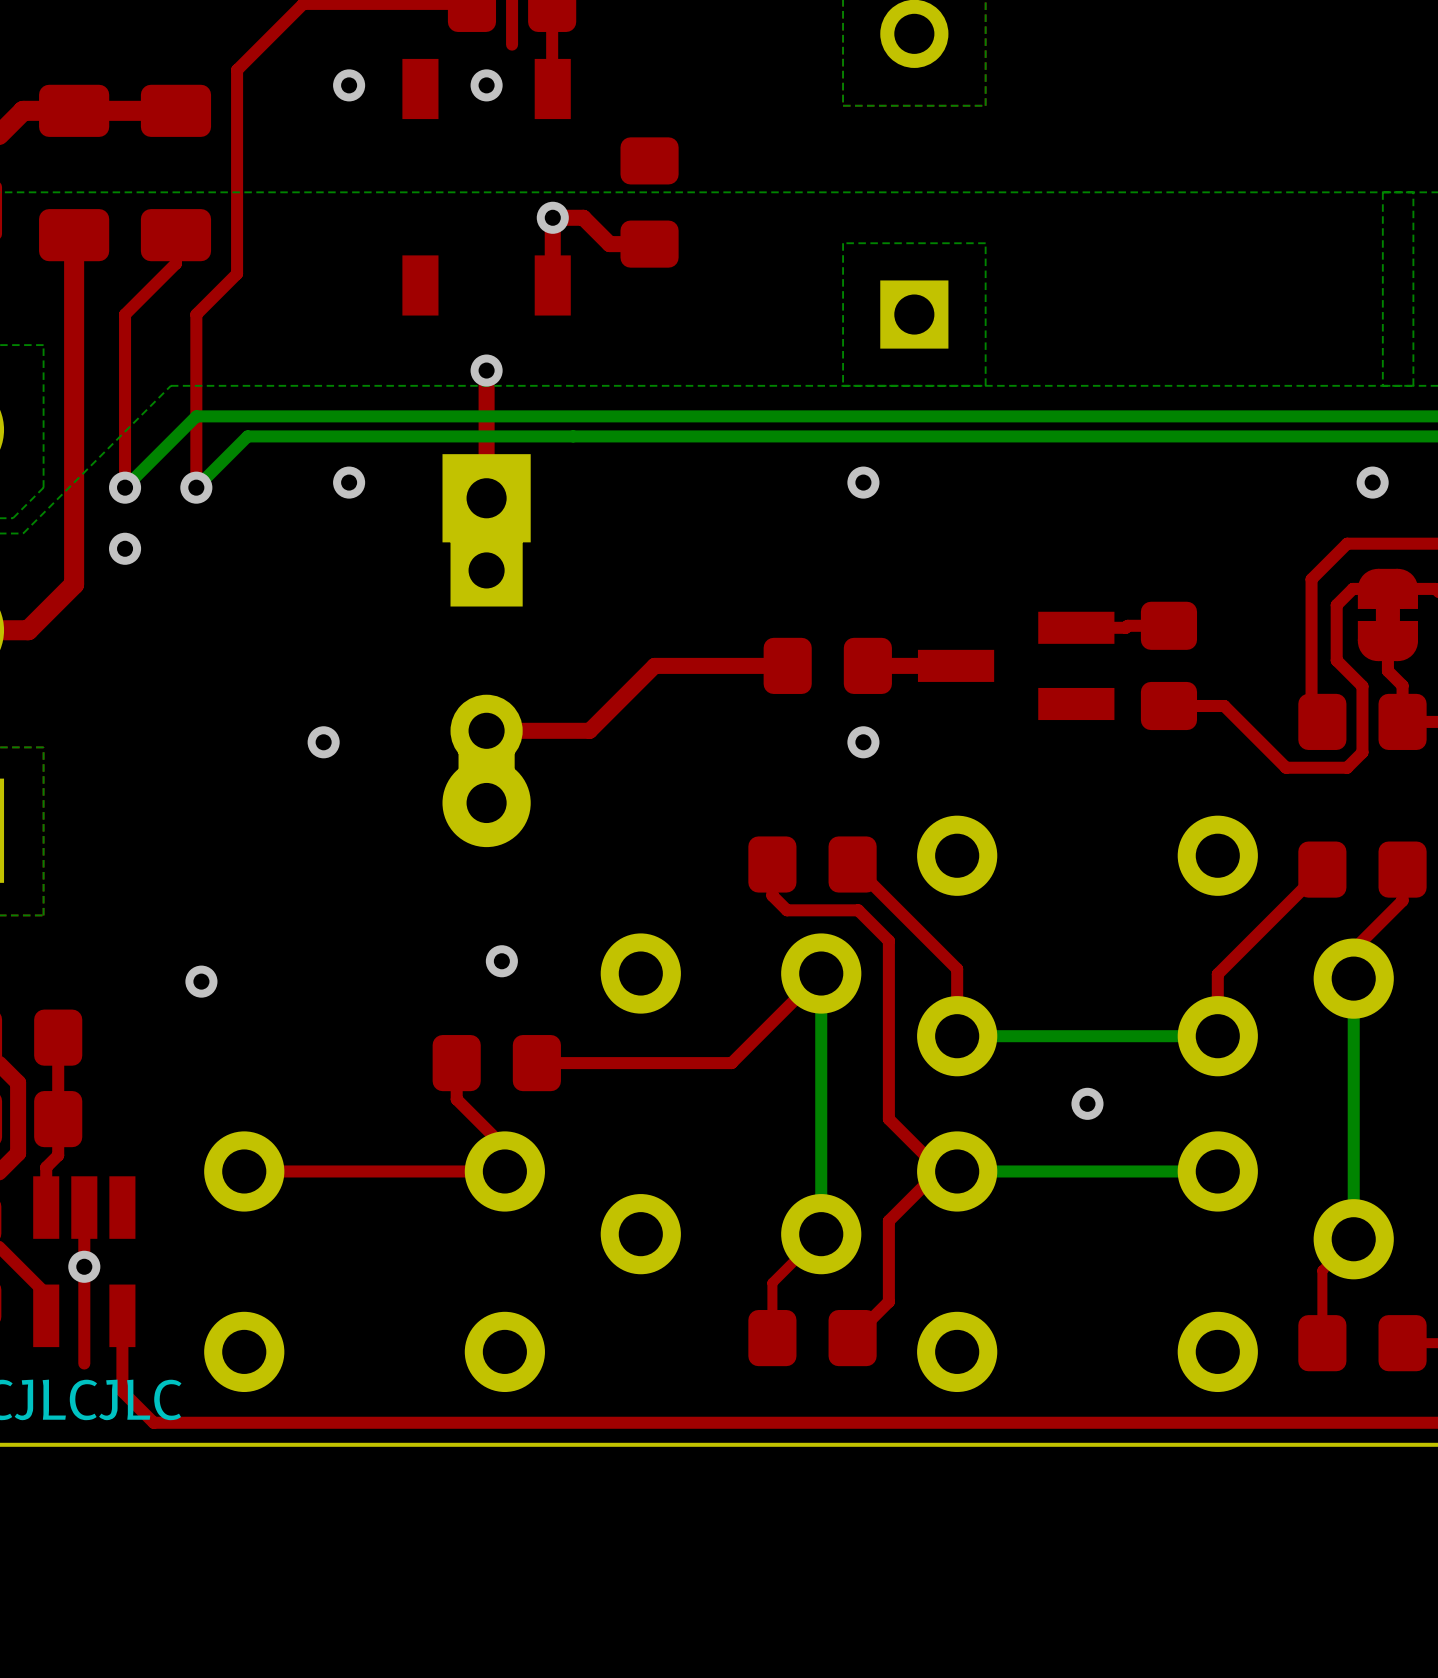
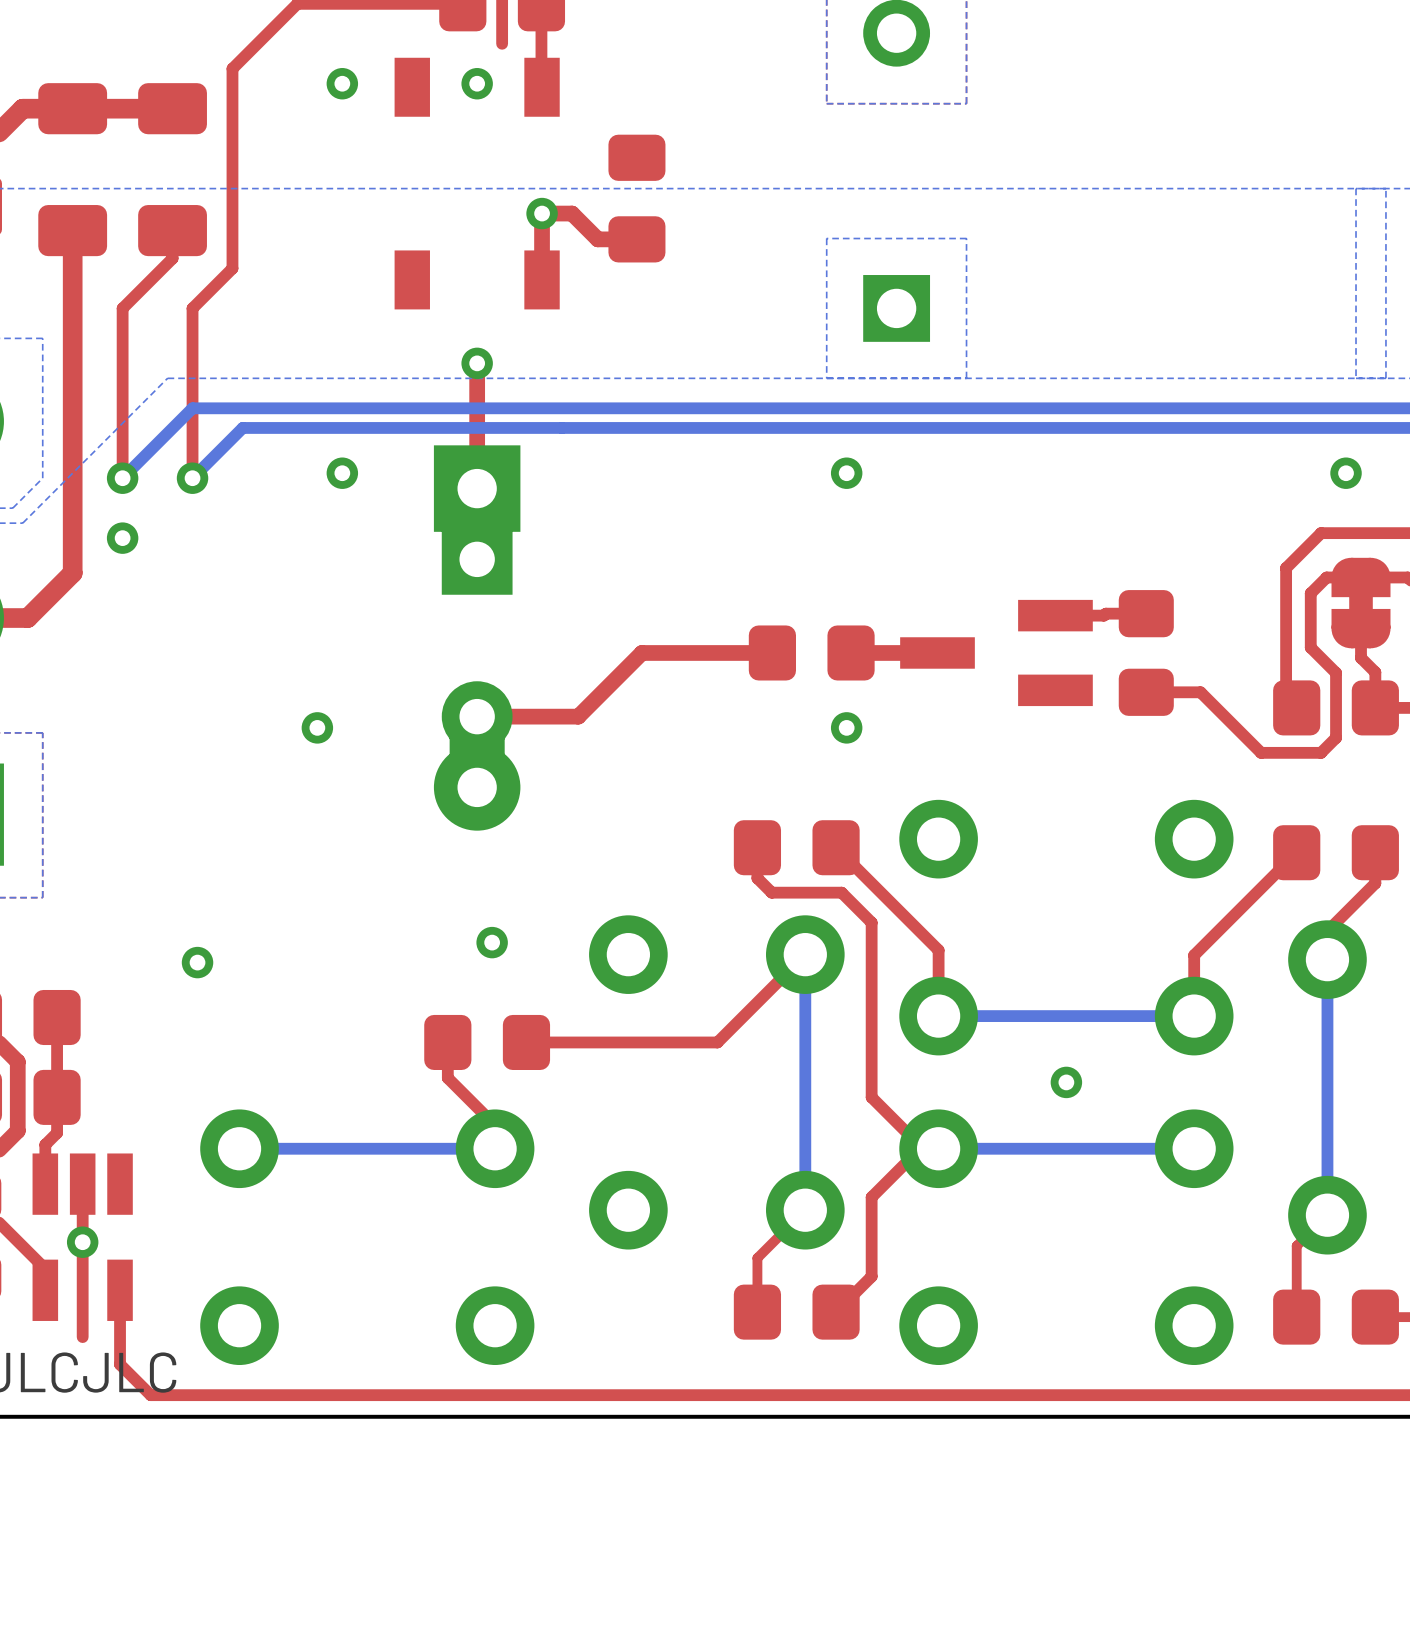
top track: (504, 1171) (244, 1171) -> none
bottom track: none -> (495, 1148) (239, 1148)

